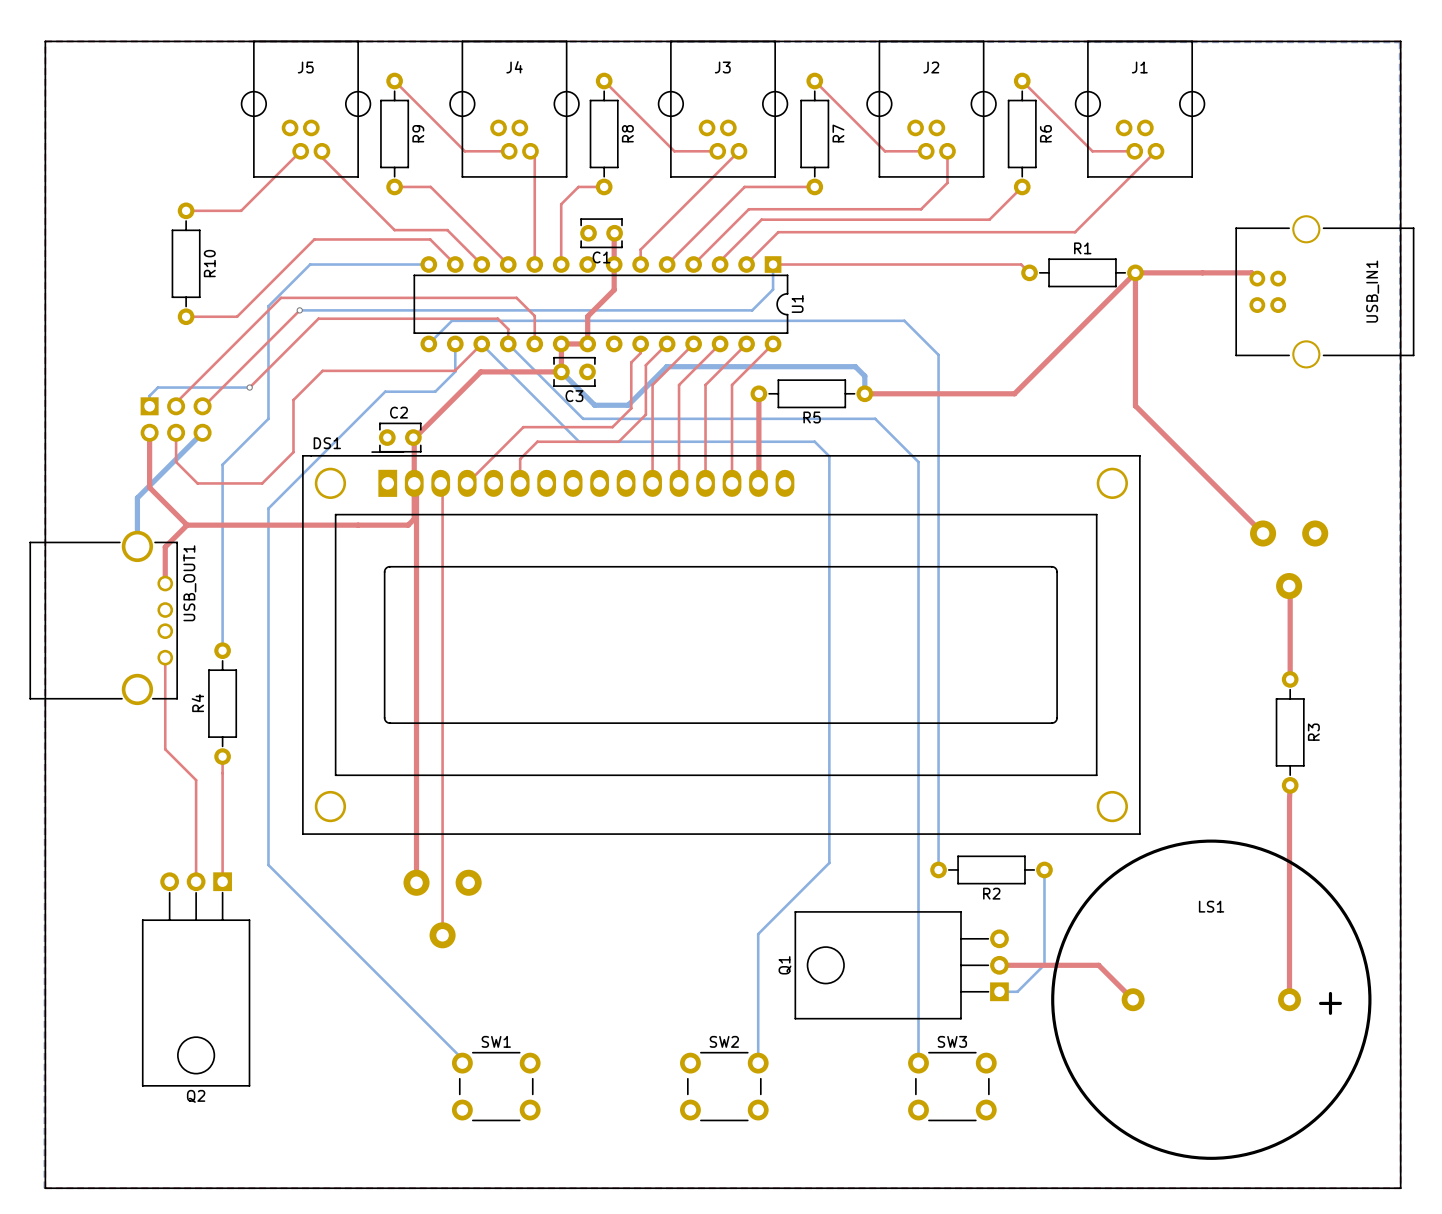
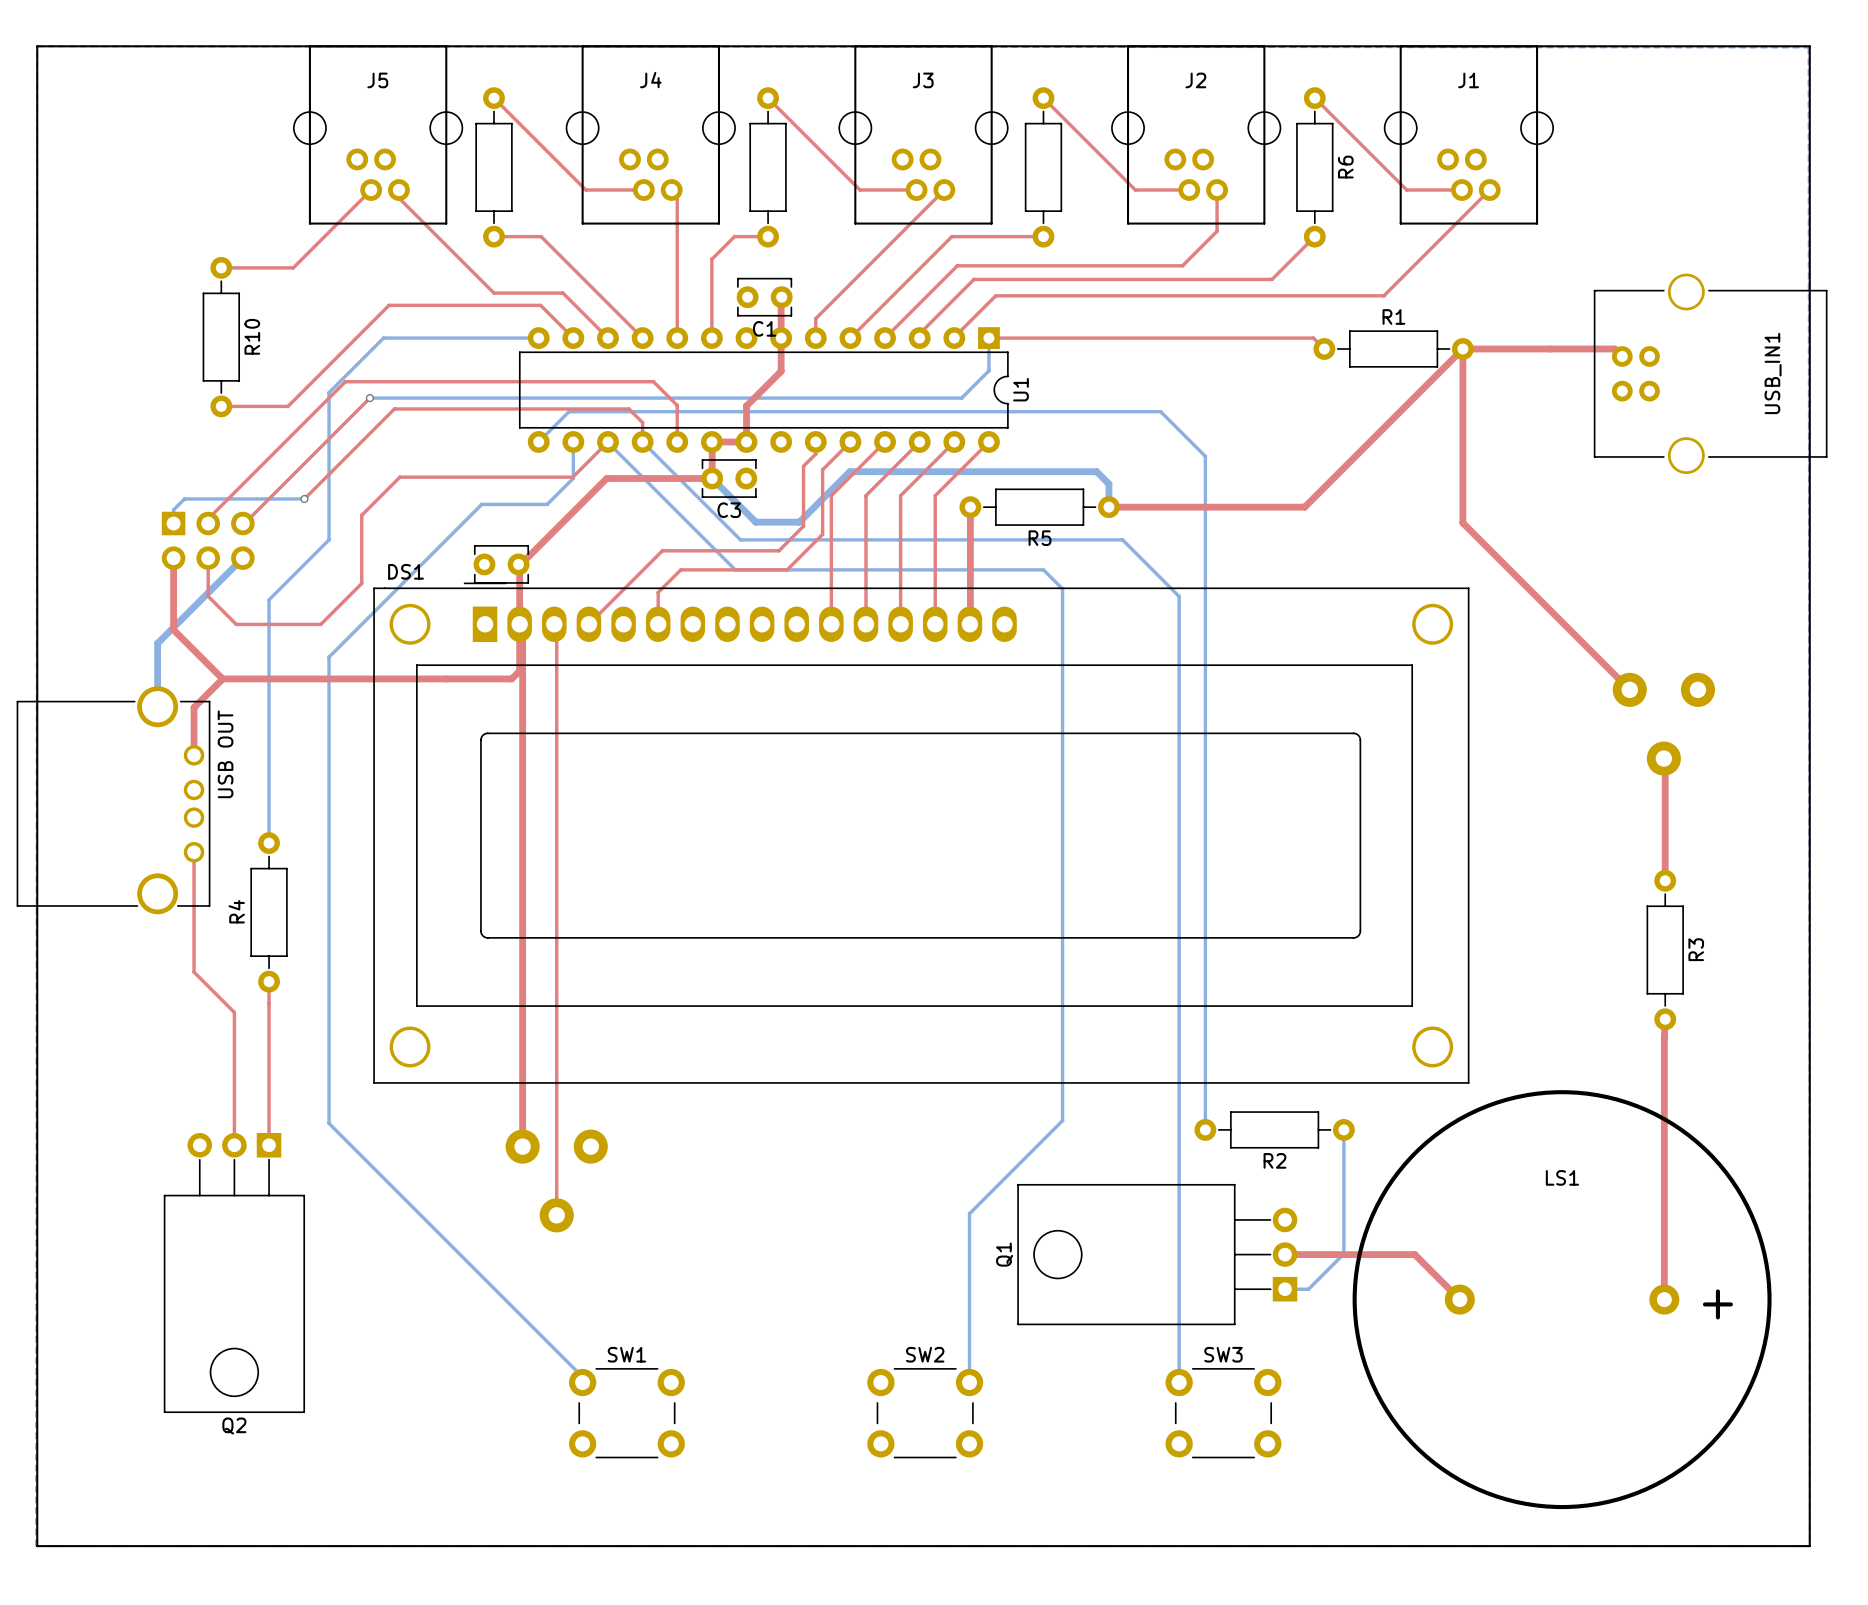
R9 name: R9 (418, 133) -> none
R8 name: R8 (627, 133) -> none
R7 name: R7 (838, 133) -> none
C2 name: C2 (398, 412) -> none
USB_OUT1 name: USB_OUT1 (189, 583) -> USB OUT (225, 754)

